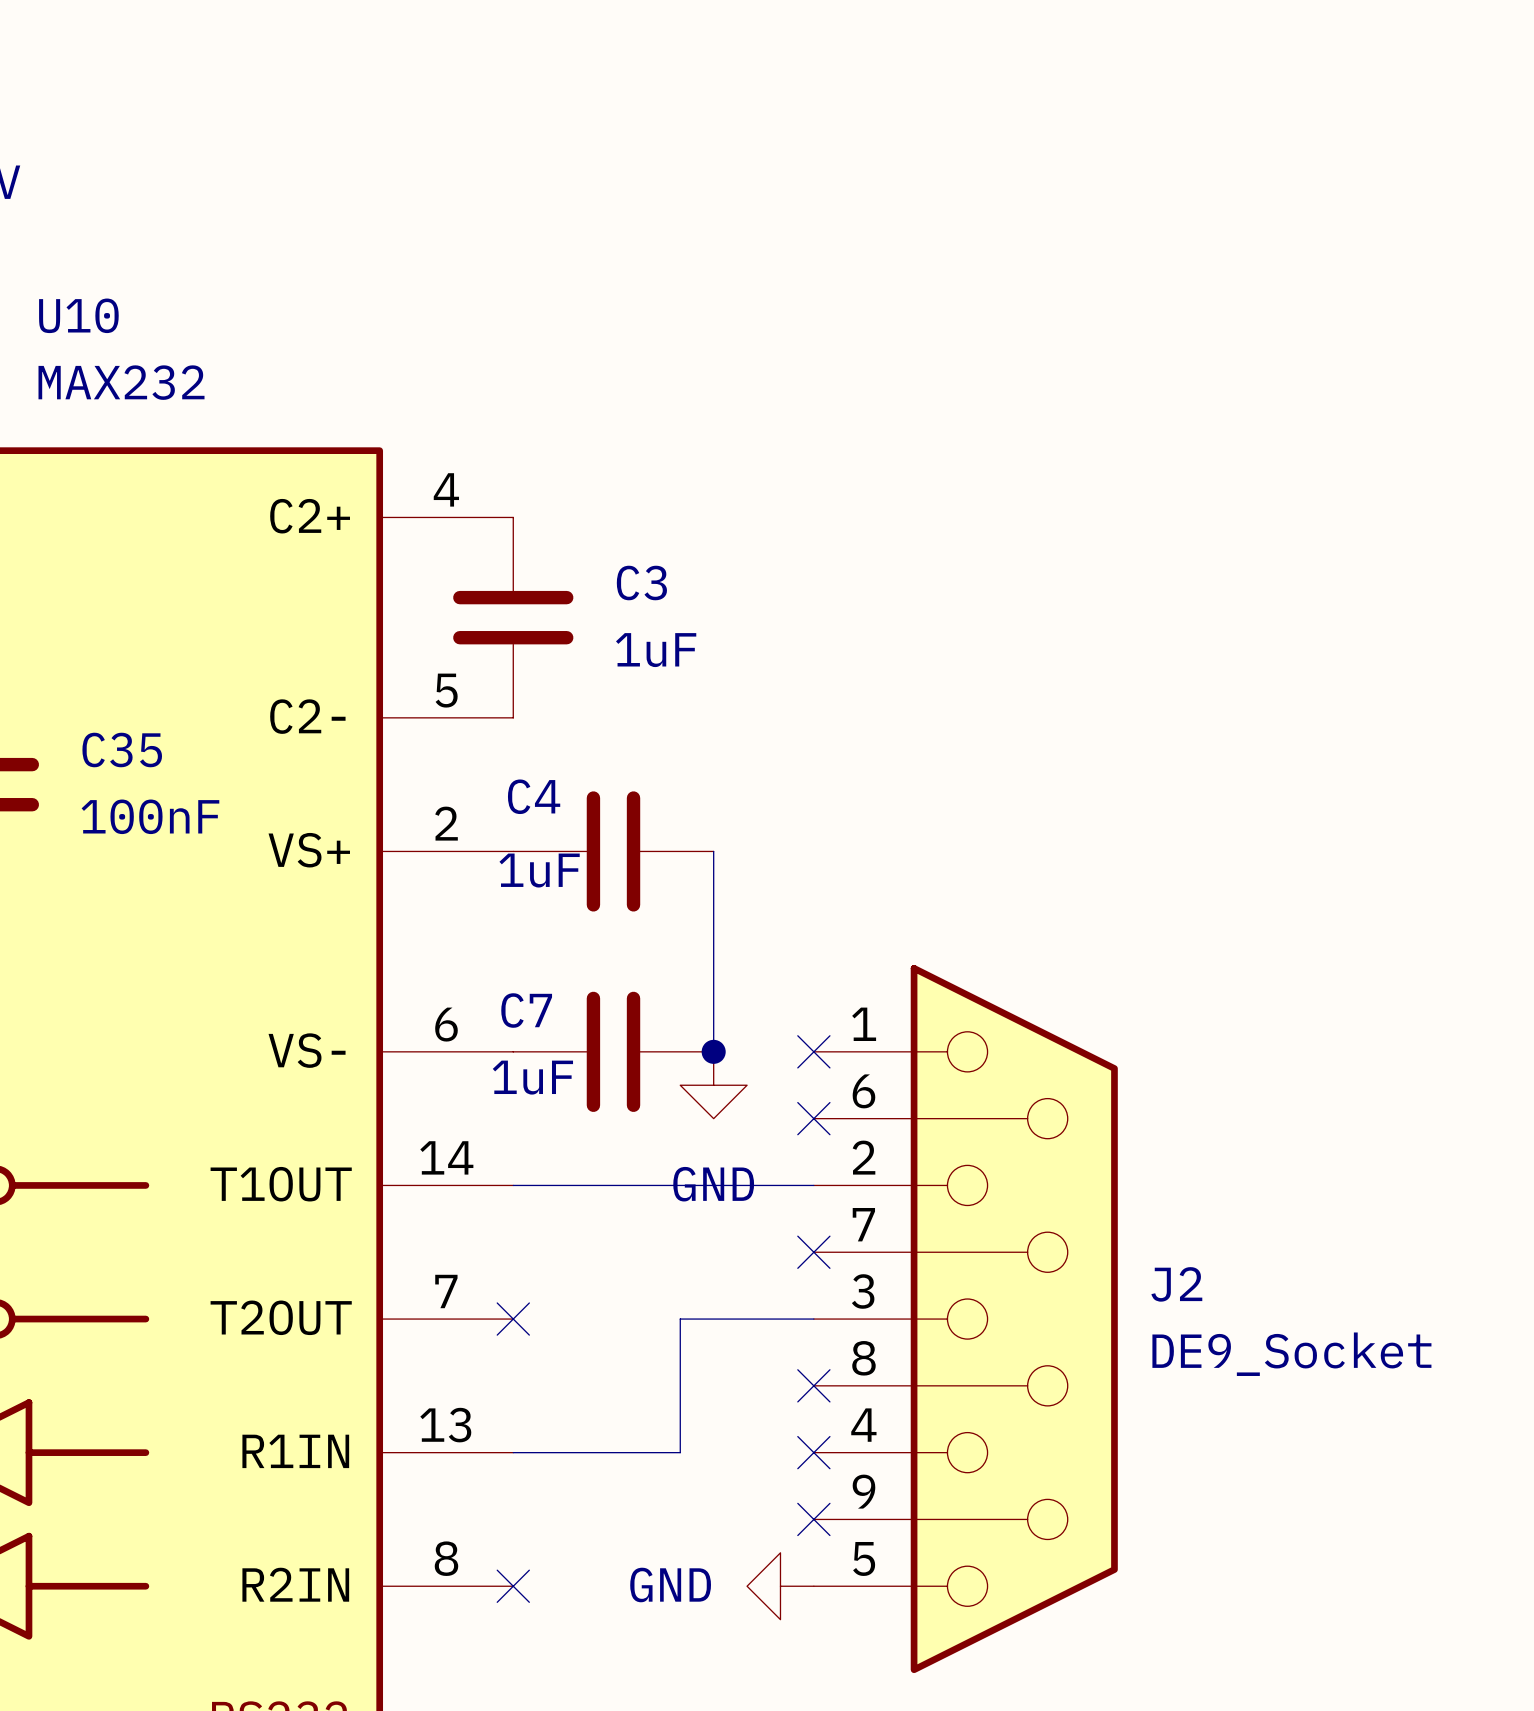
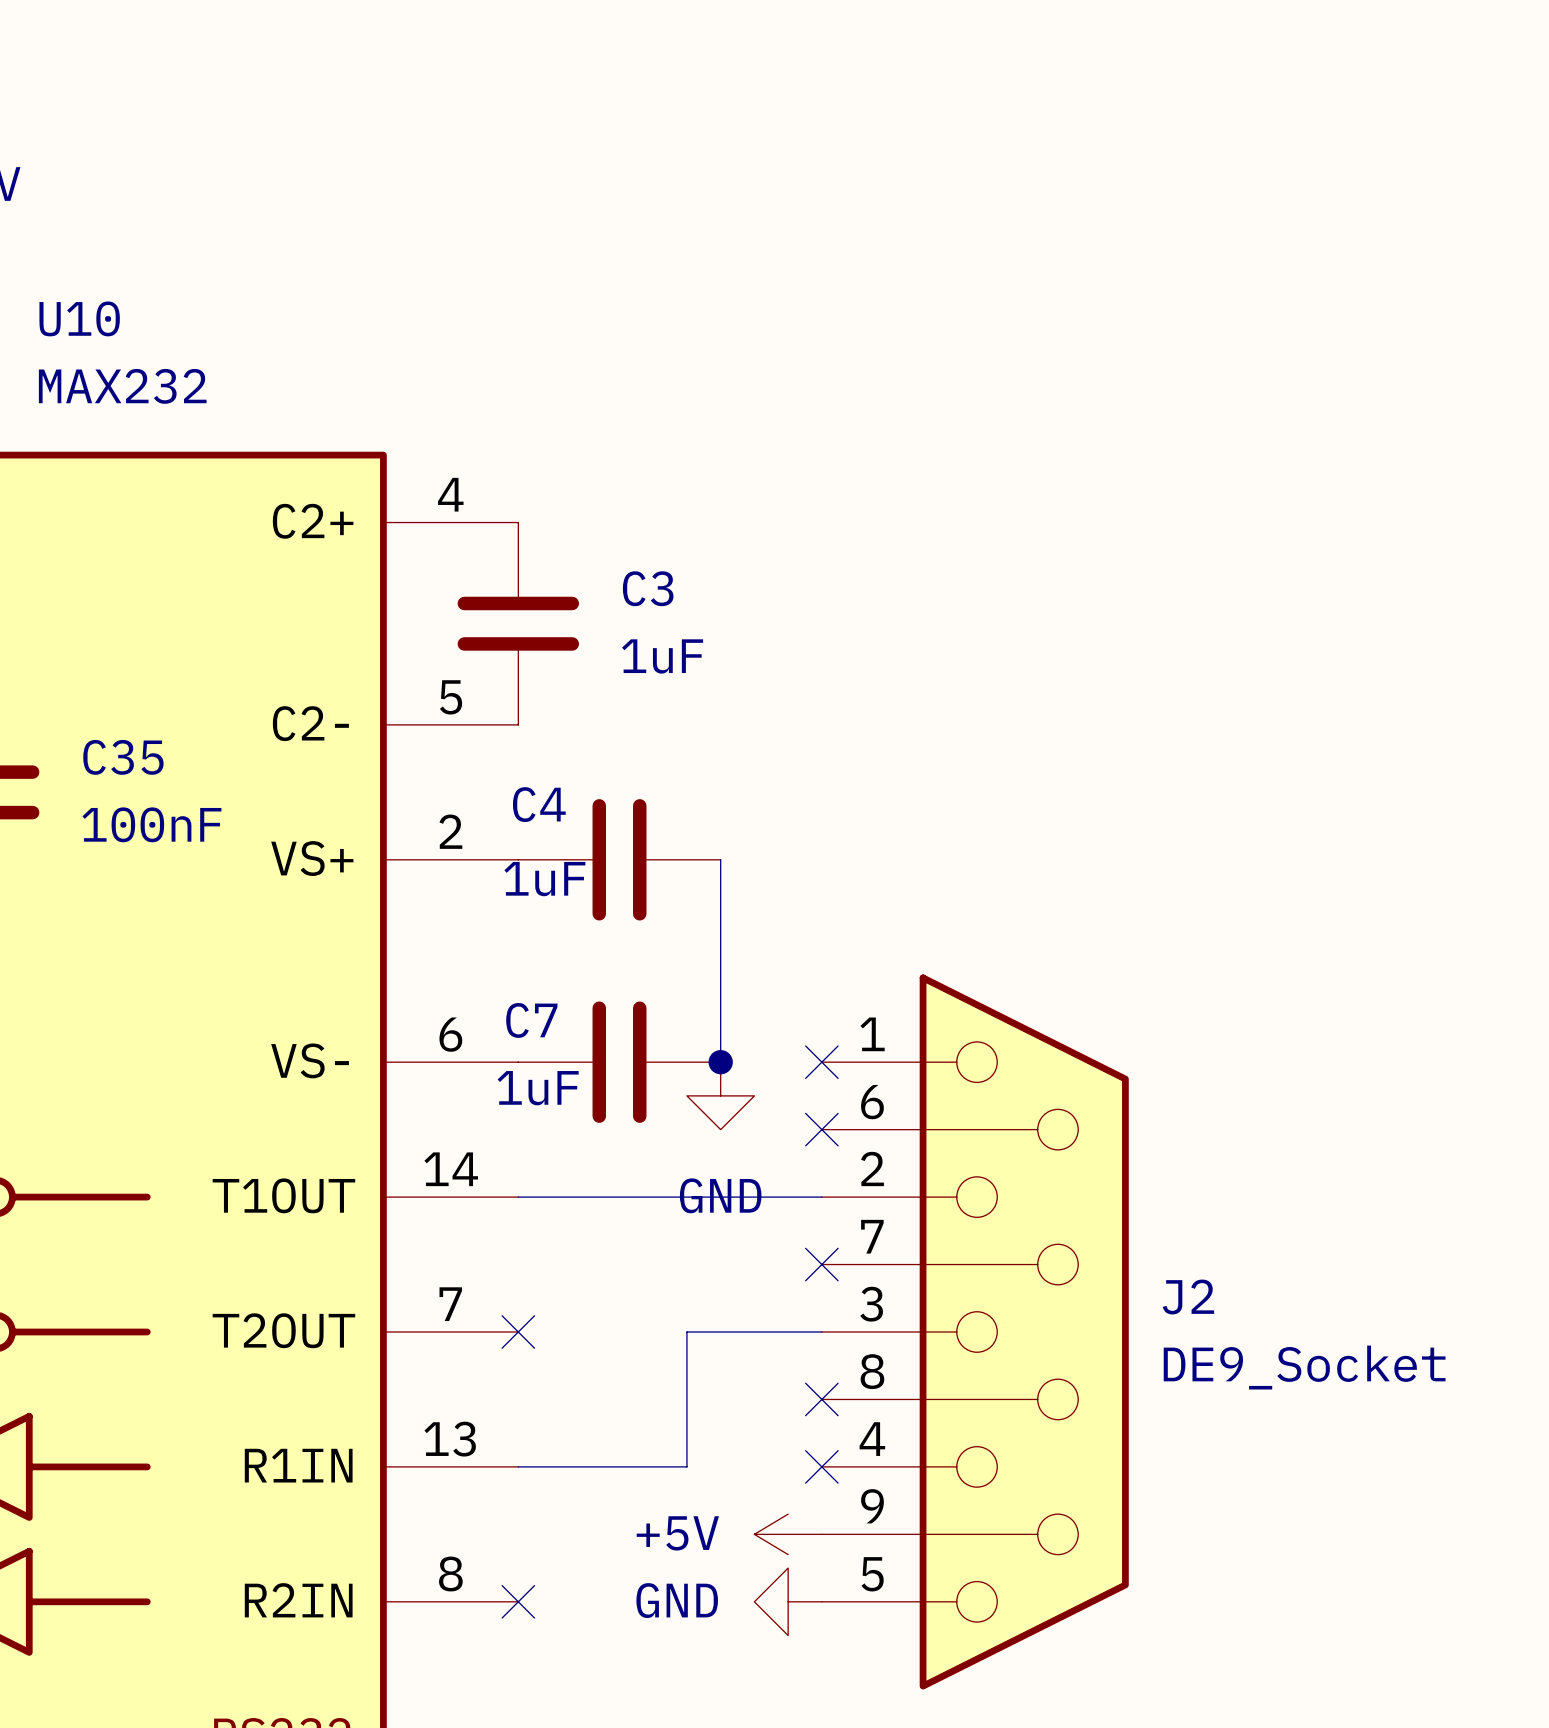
power symbol: none -> +5V (788, 1534)
no-connect mark: (813, 1519) -> none

